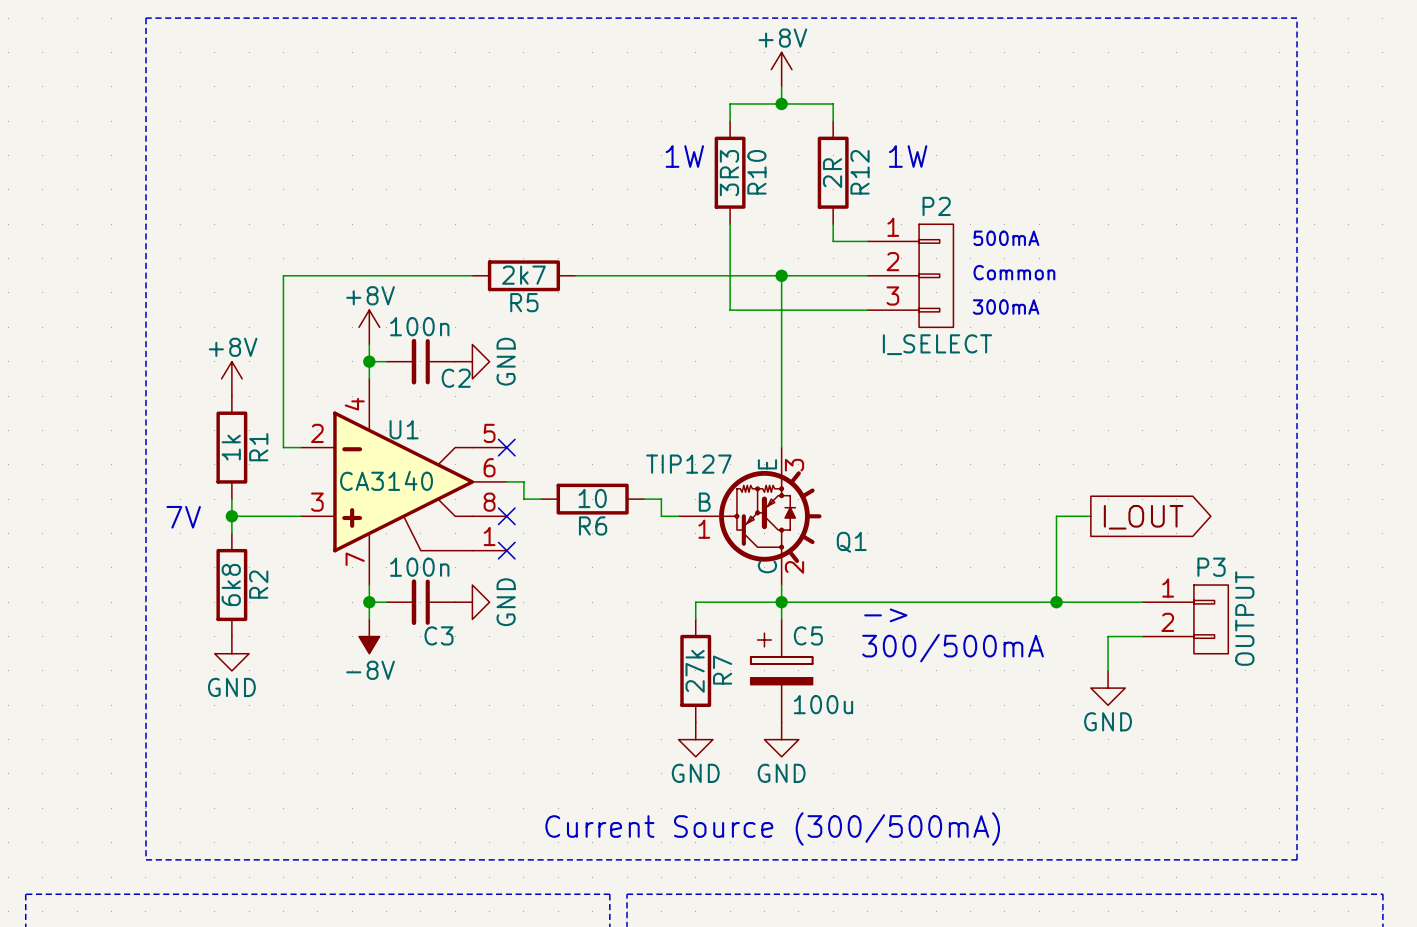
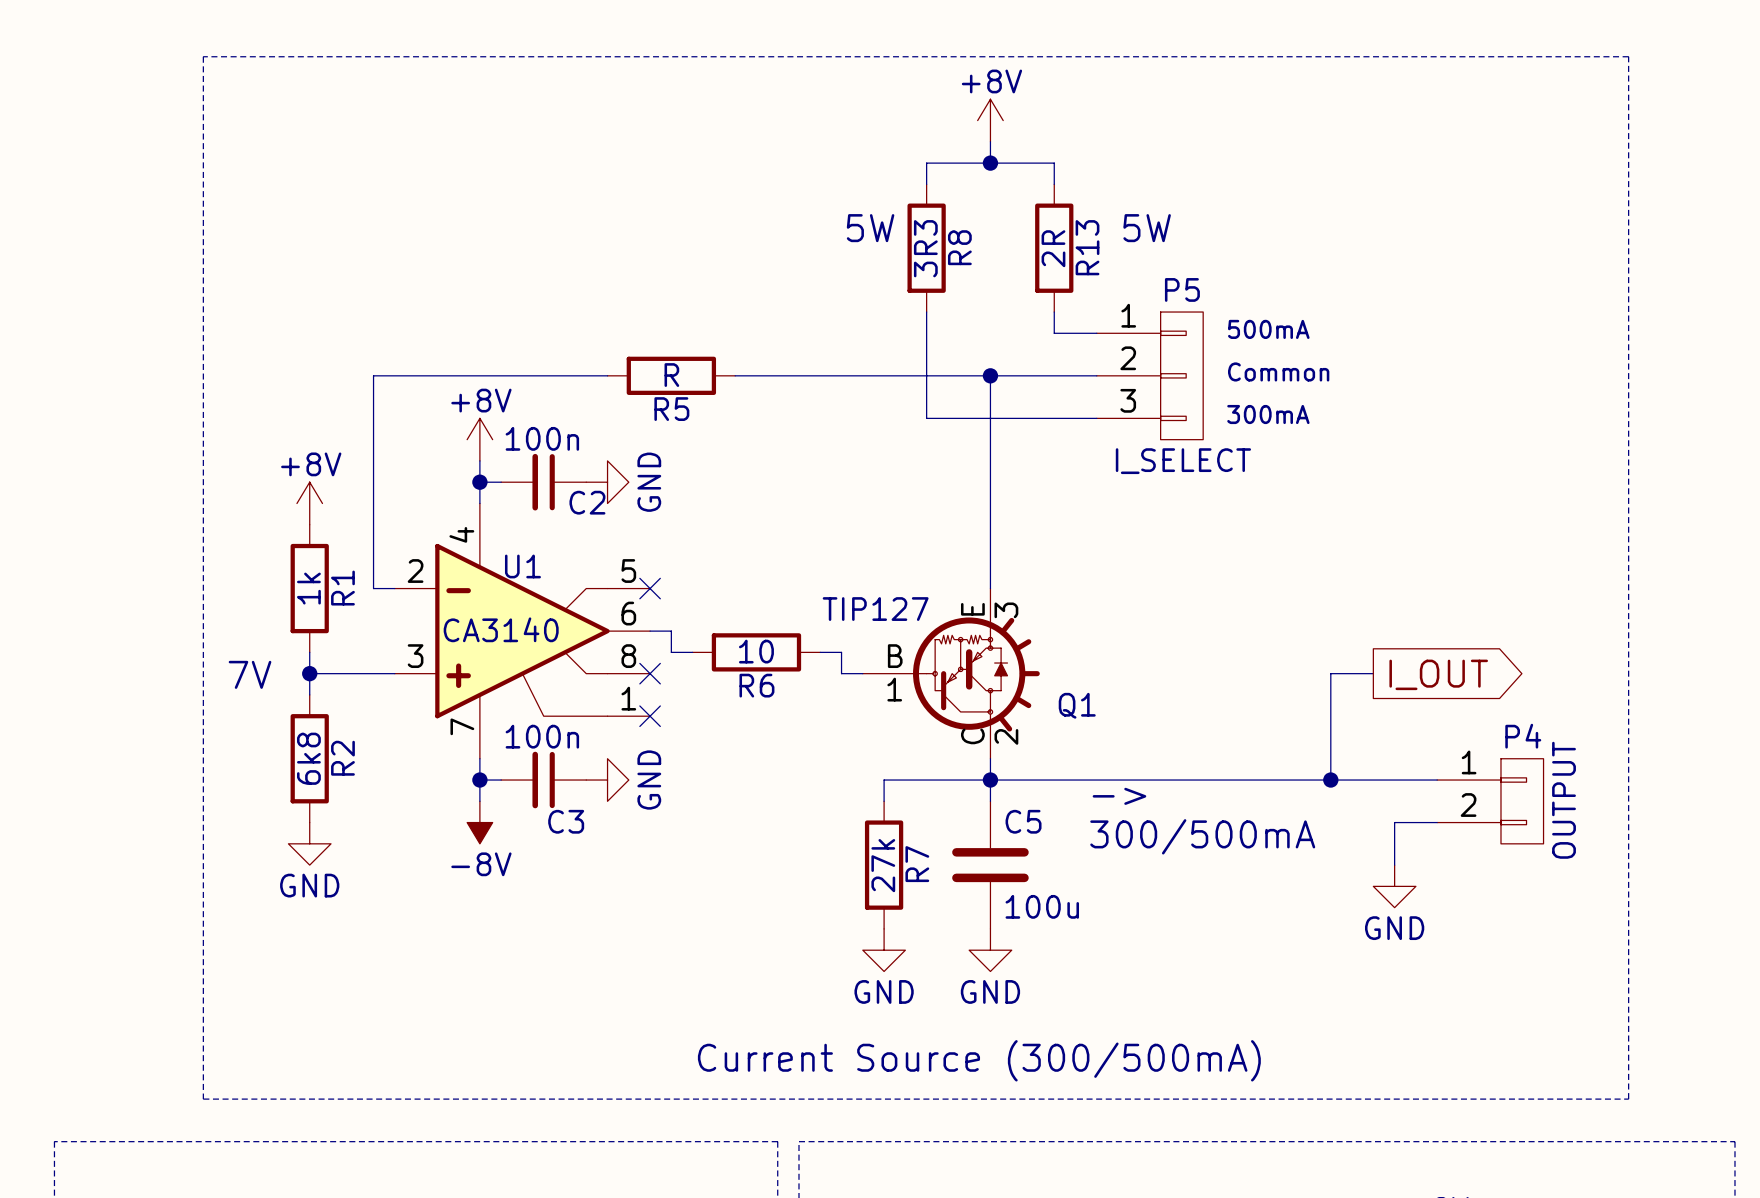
text: 1W (684, 156) -> 5W (870, 228)
text: 1W (908, 156) -> 5W (1147, 228)
R10 name: R10 (756, 172) -> R8 (959, 247)
R12 name: R12 (860, 172) -> R13 (1087, 247)
P2 name: P2 (936, 206) -> P5 (1182, 289)
R5 value: 2k7 (523, 275) -> R (671, 375)
P3 name: P3 (1211, 567) -> P4 (1523, 736)
C5 symbol: [750, 619, 813, 723] -> [952, 801, 1029, 929]

